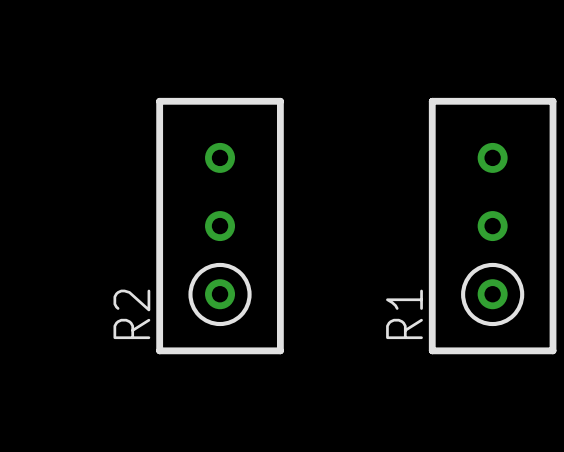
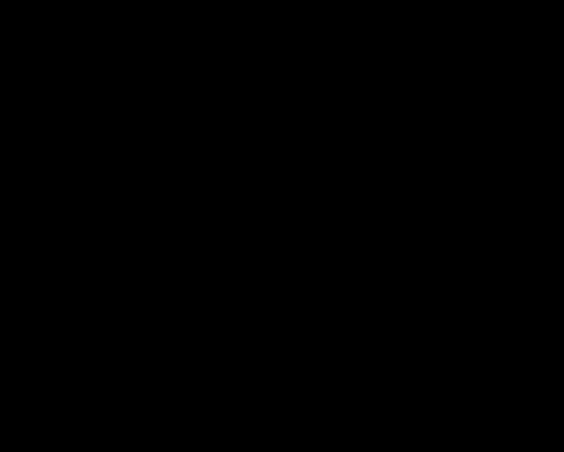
R2: (220, 226) -> none
R1: (492, 226) -> none

